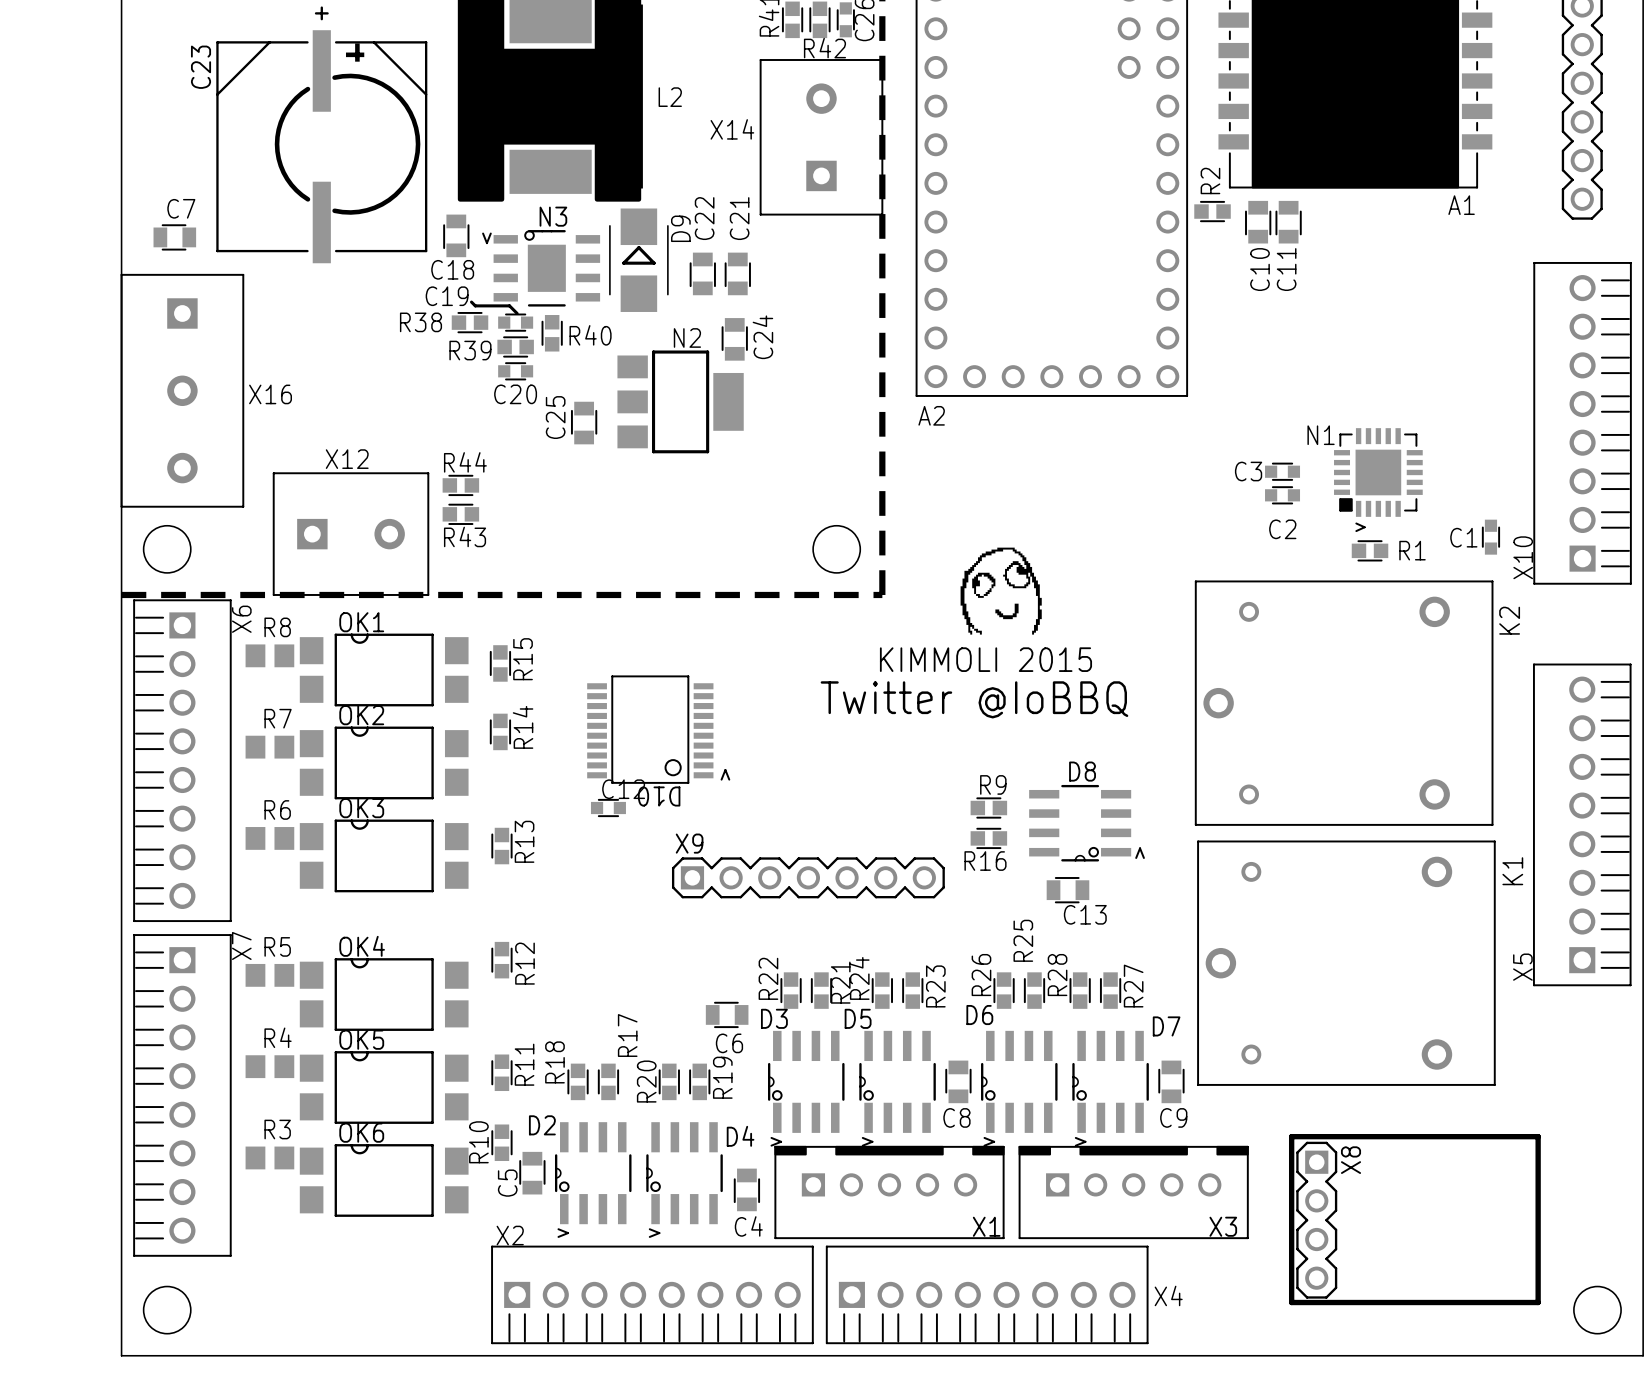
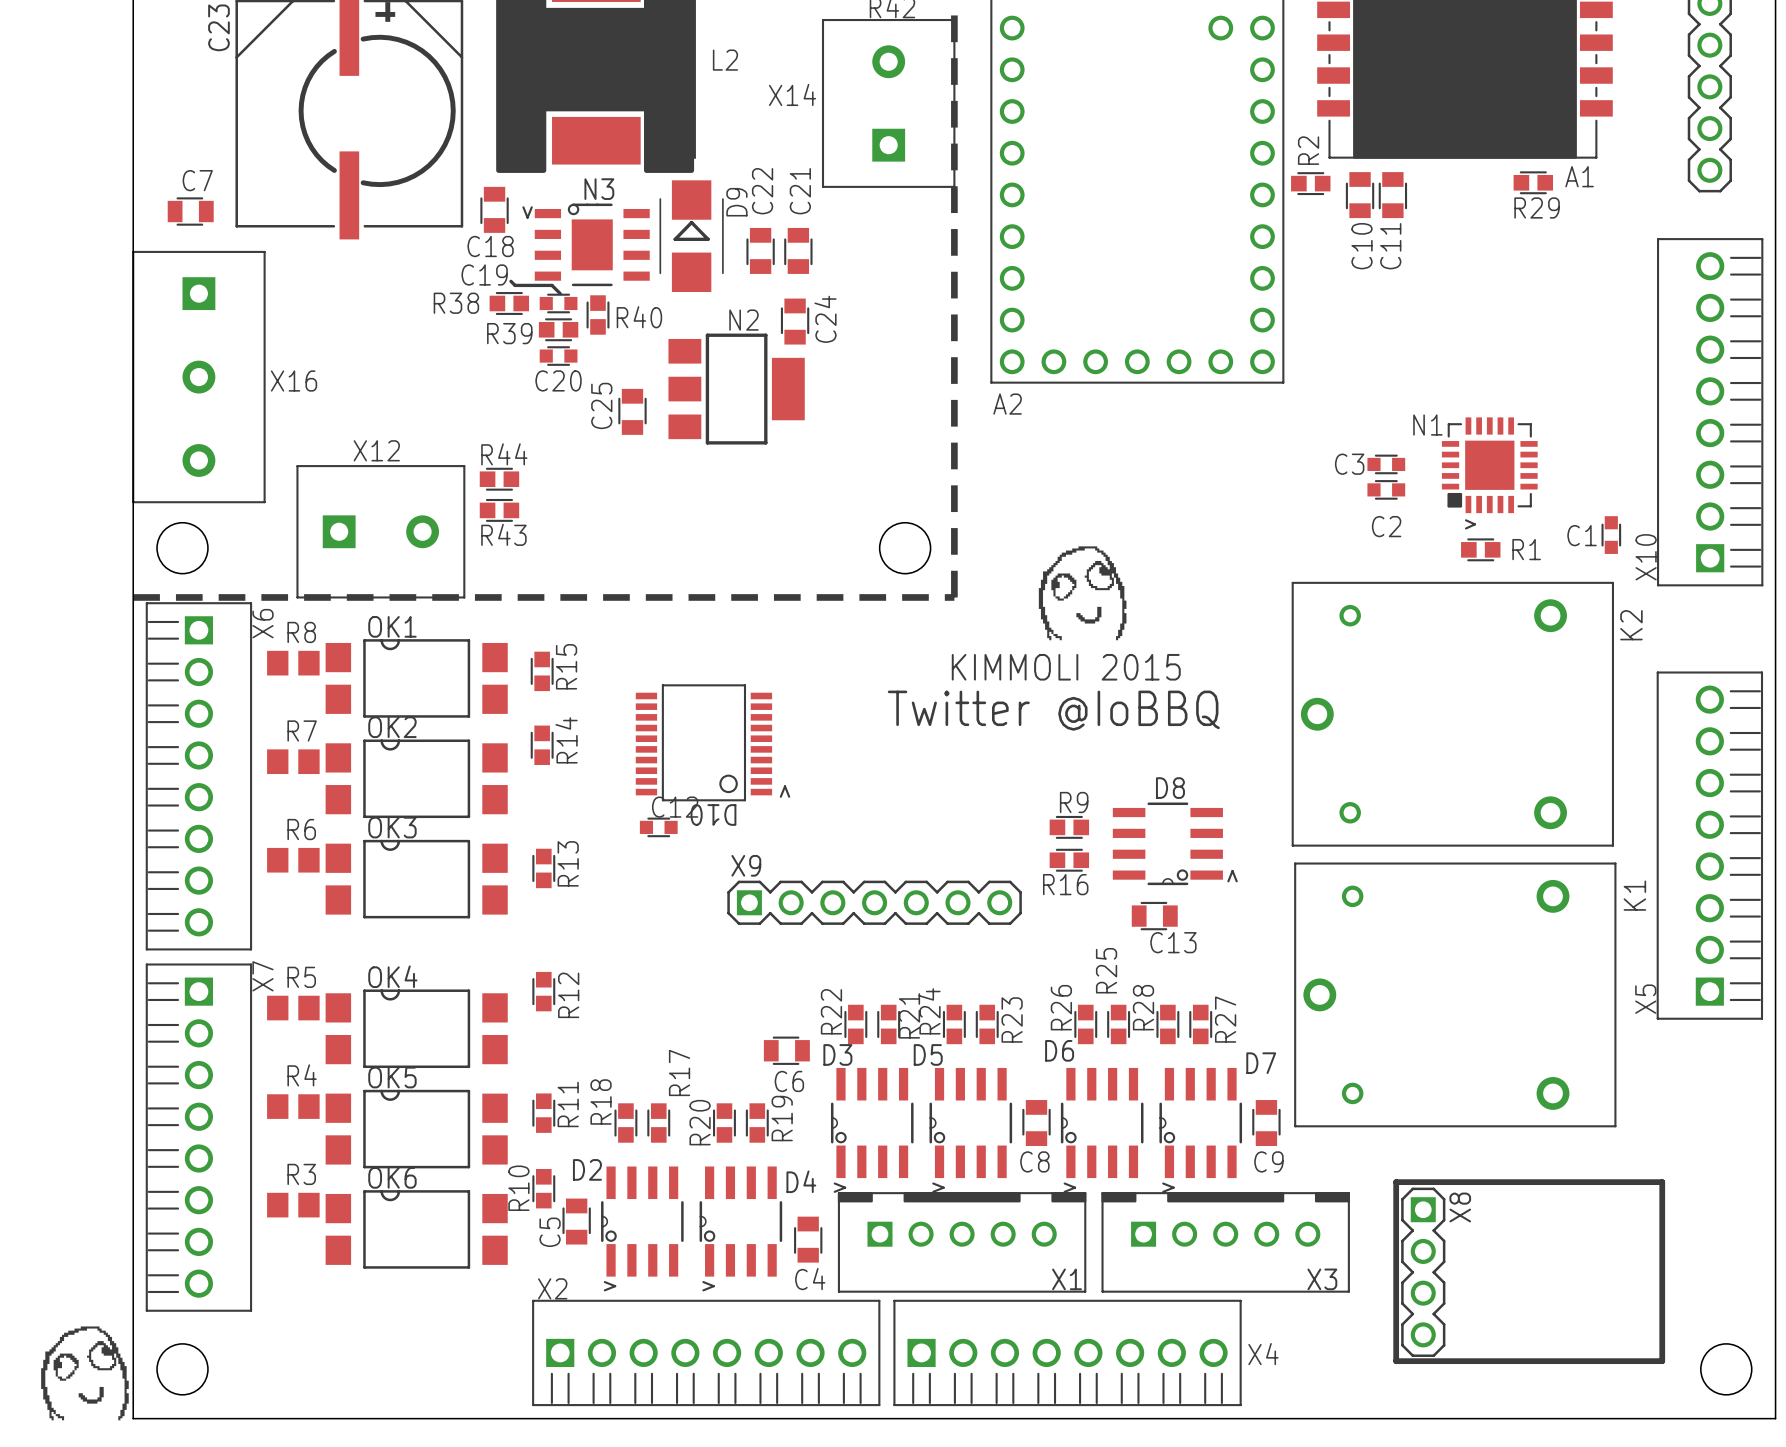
R29: none -> (1533, 182)
drawing: none -> [41, 1326, 129, 1421]

